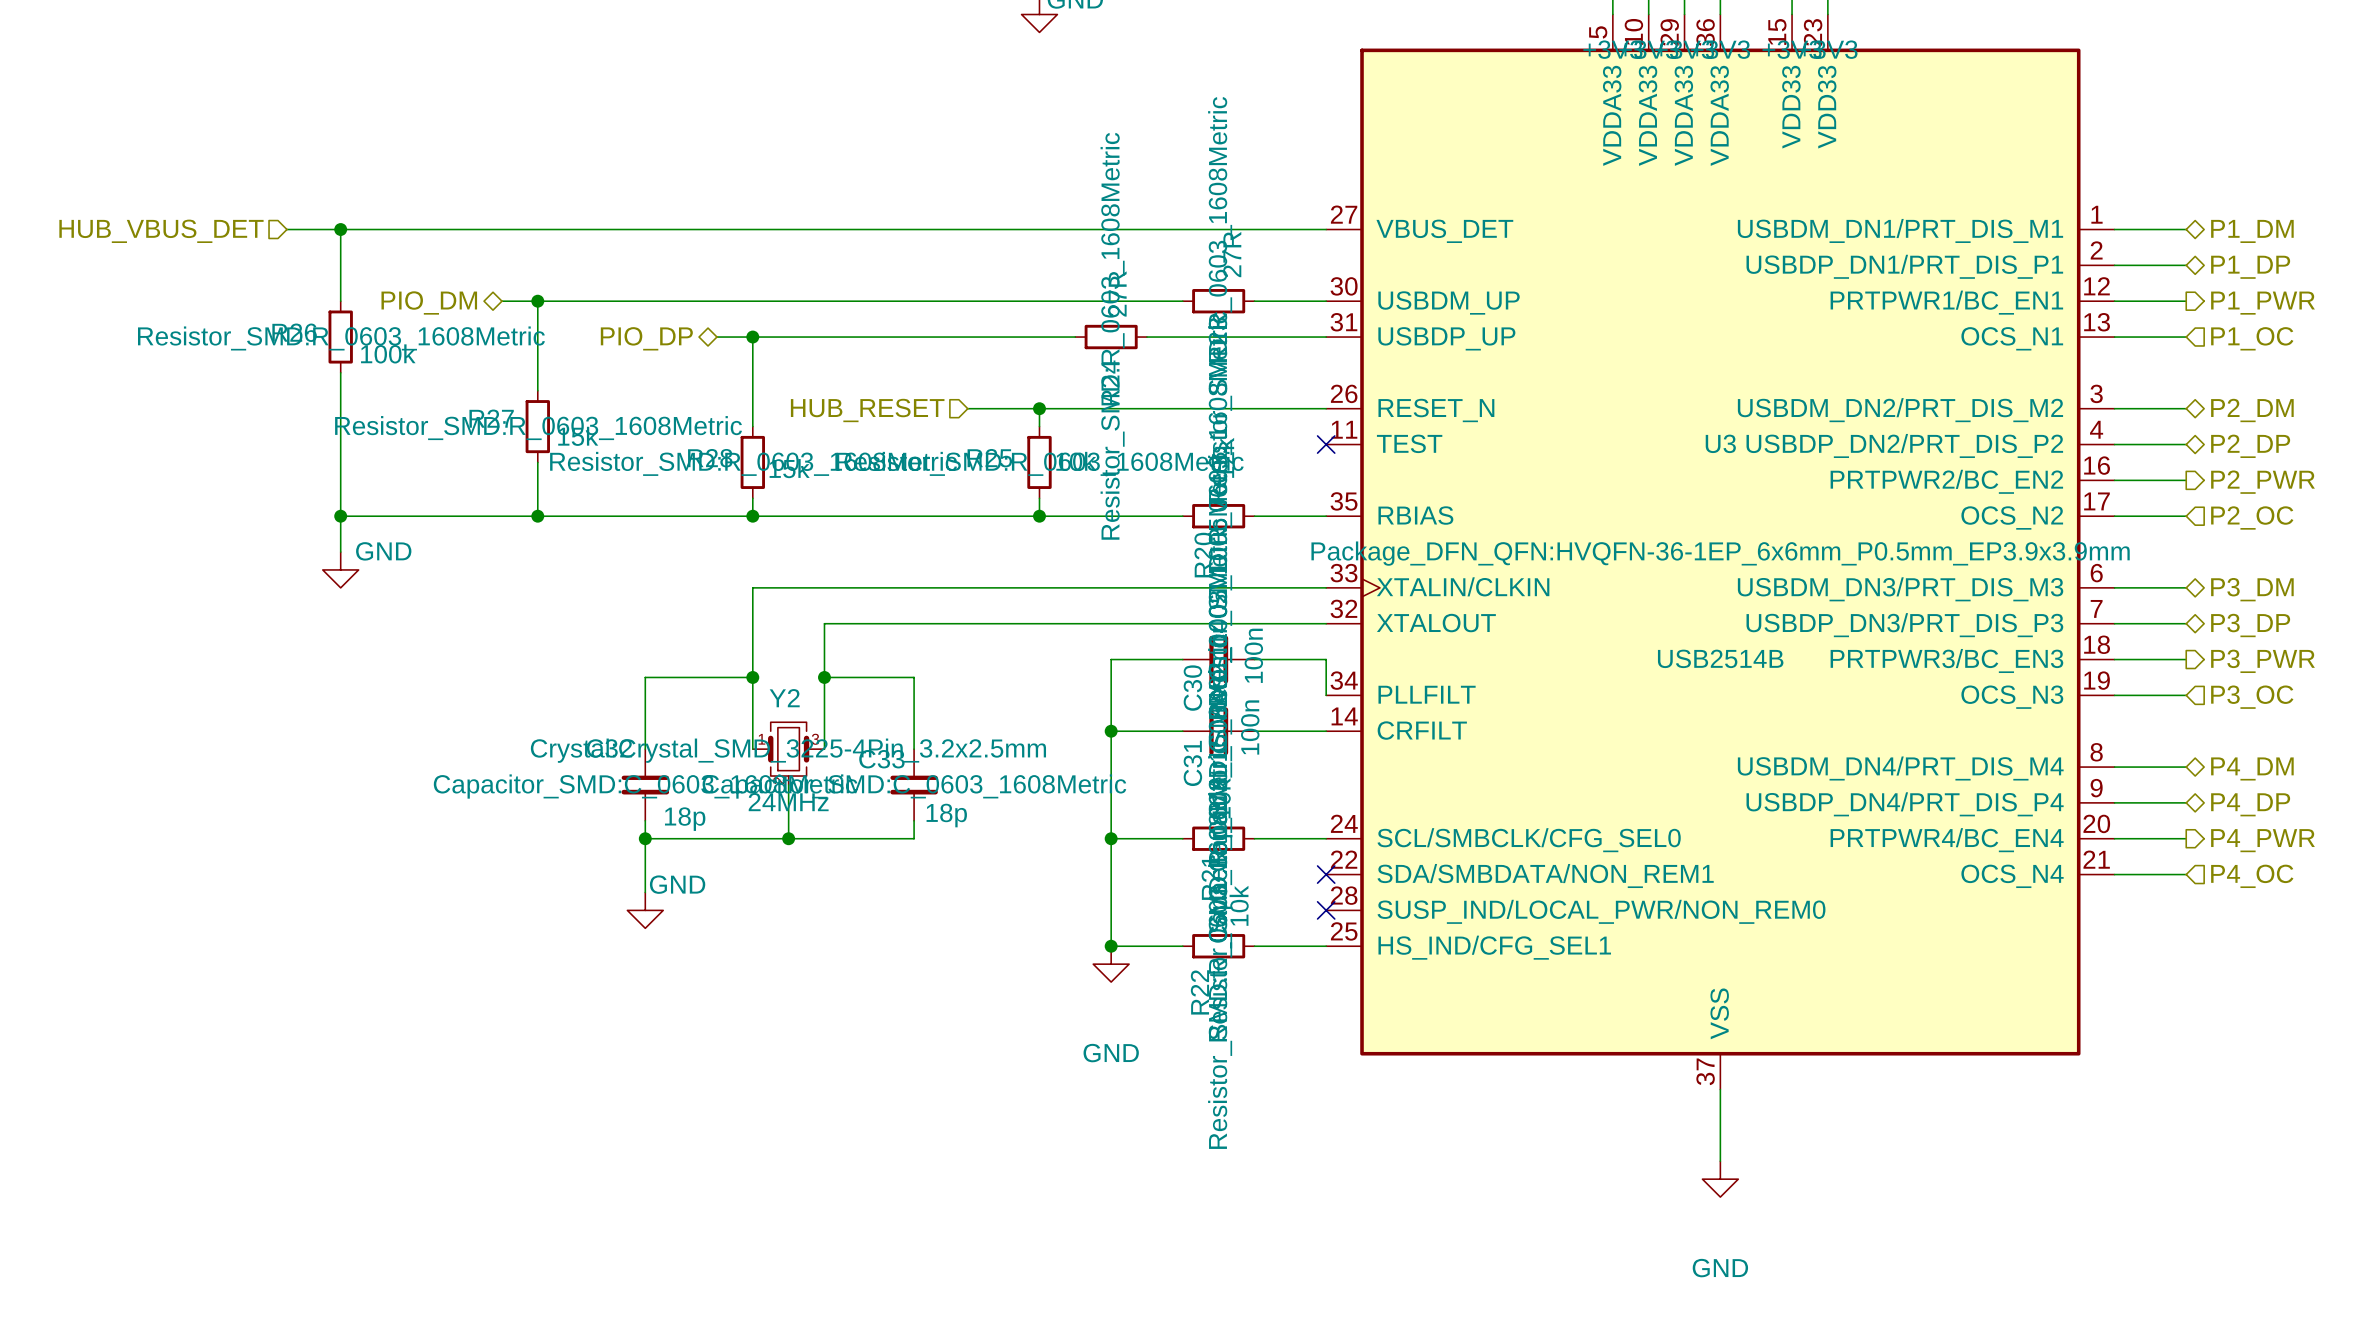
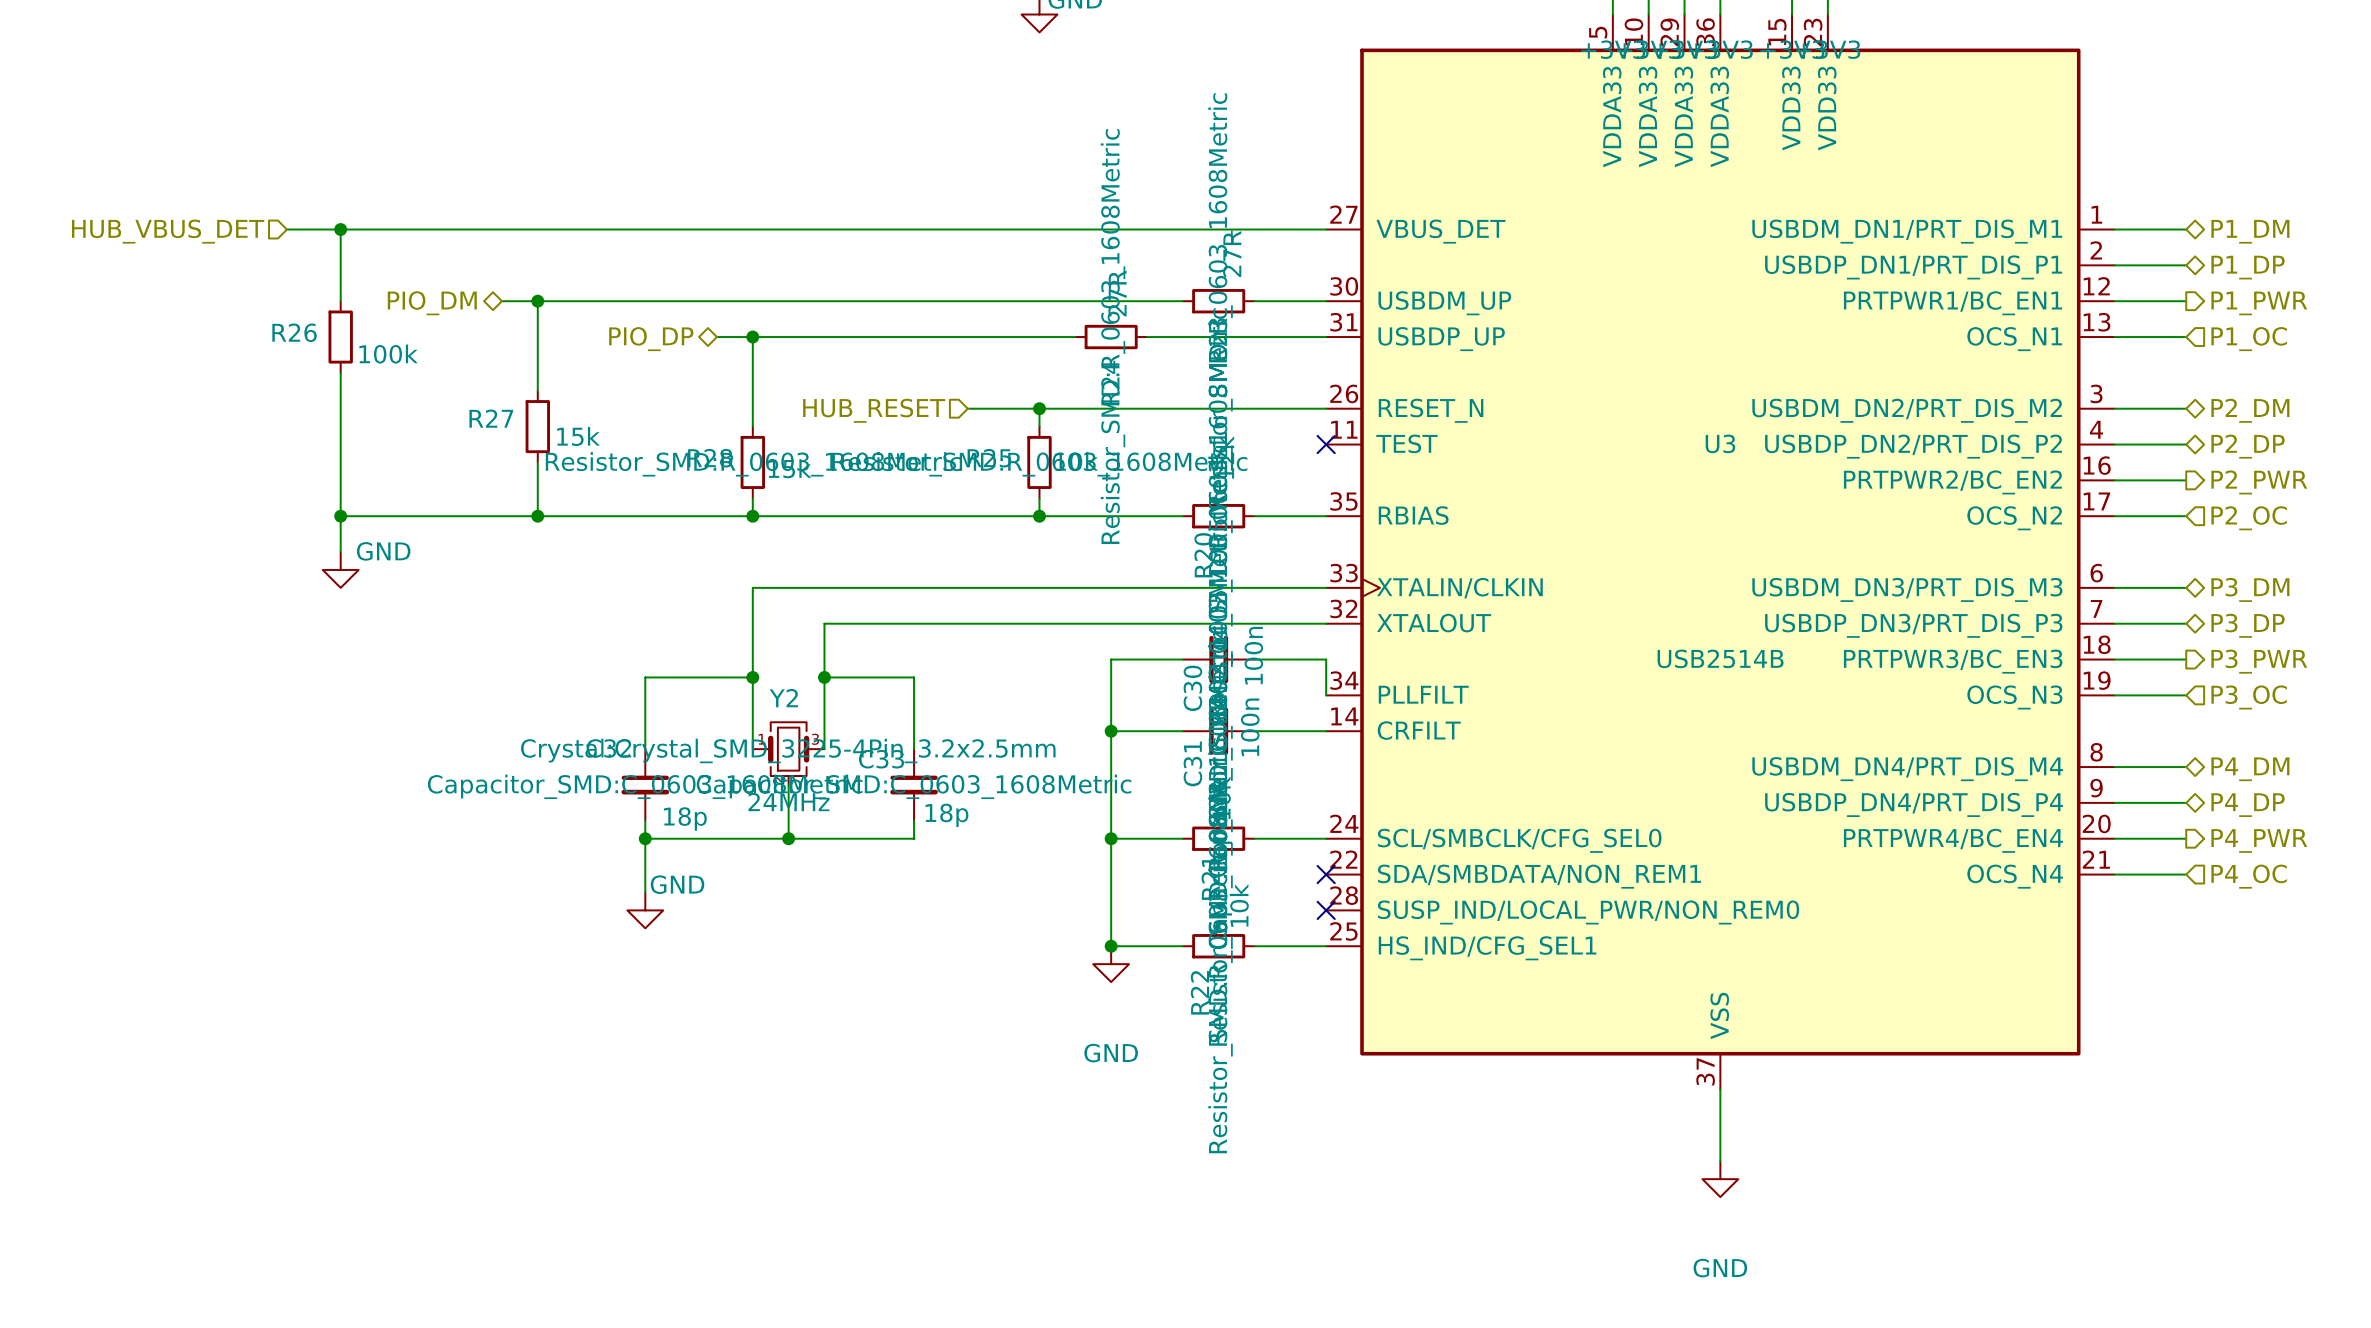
R26 text: Resistor_SMD:R_0603_1608Metric (341, 338) -> none
R27 text: Resistor_SMD:R_0603_1608Metric (538, 428) -> none
U3 text: Package_DFN_QFN:HVQFN-36-1EP_6x6mm_P0.5mm_EP3.9x3.9mm (1720, 553) -> none

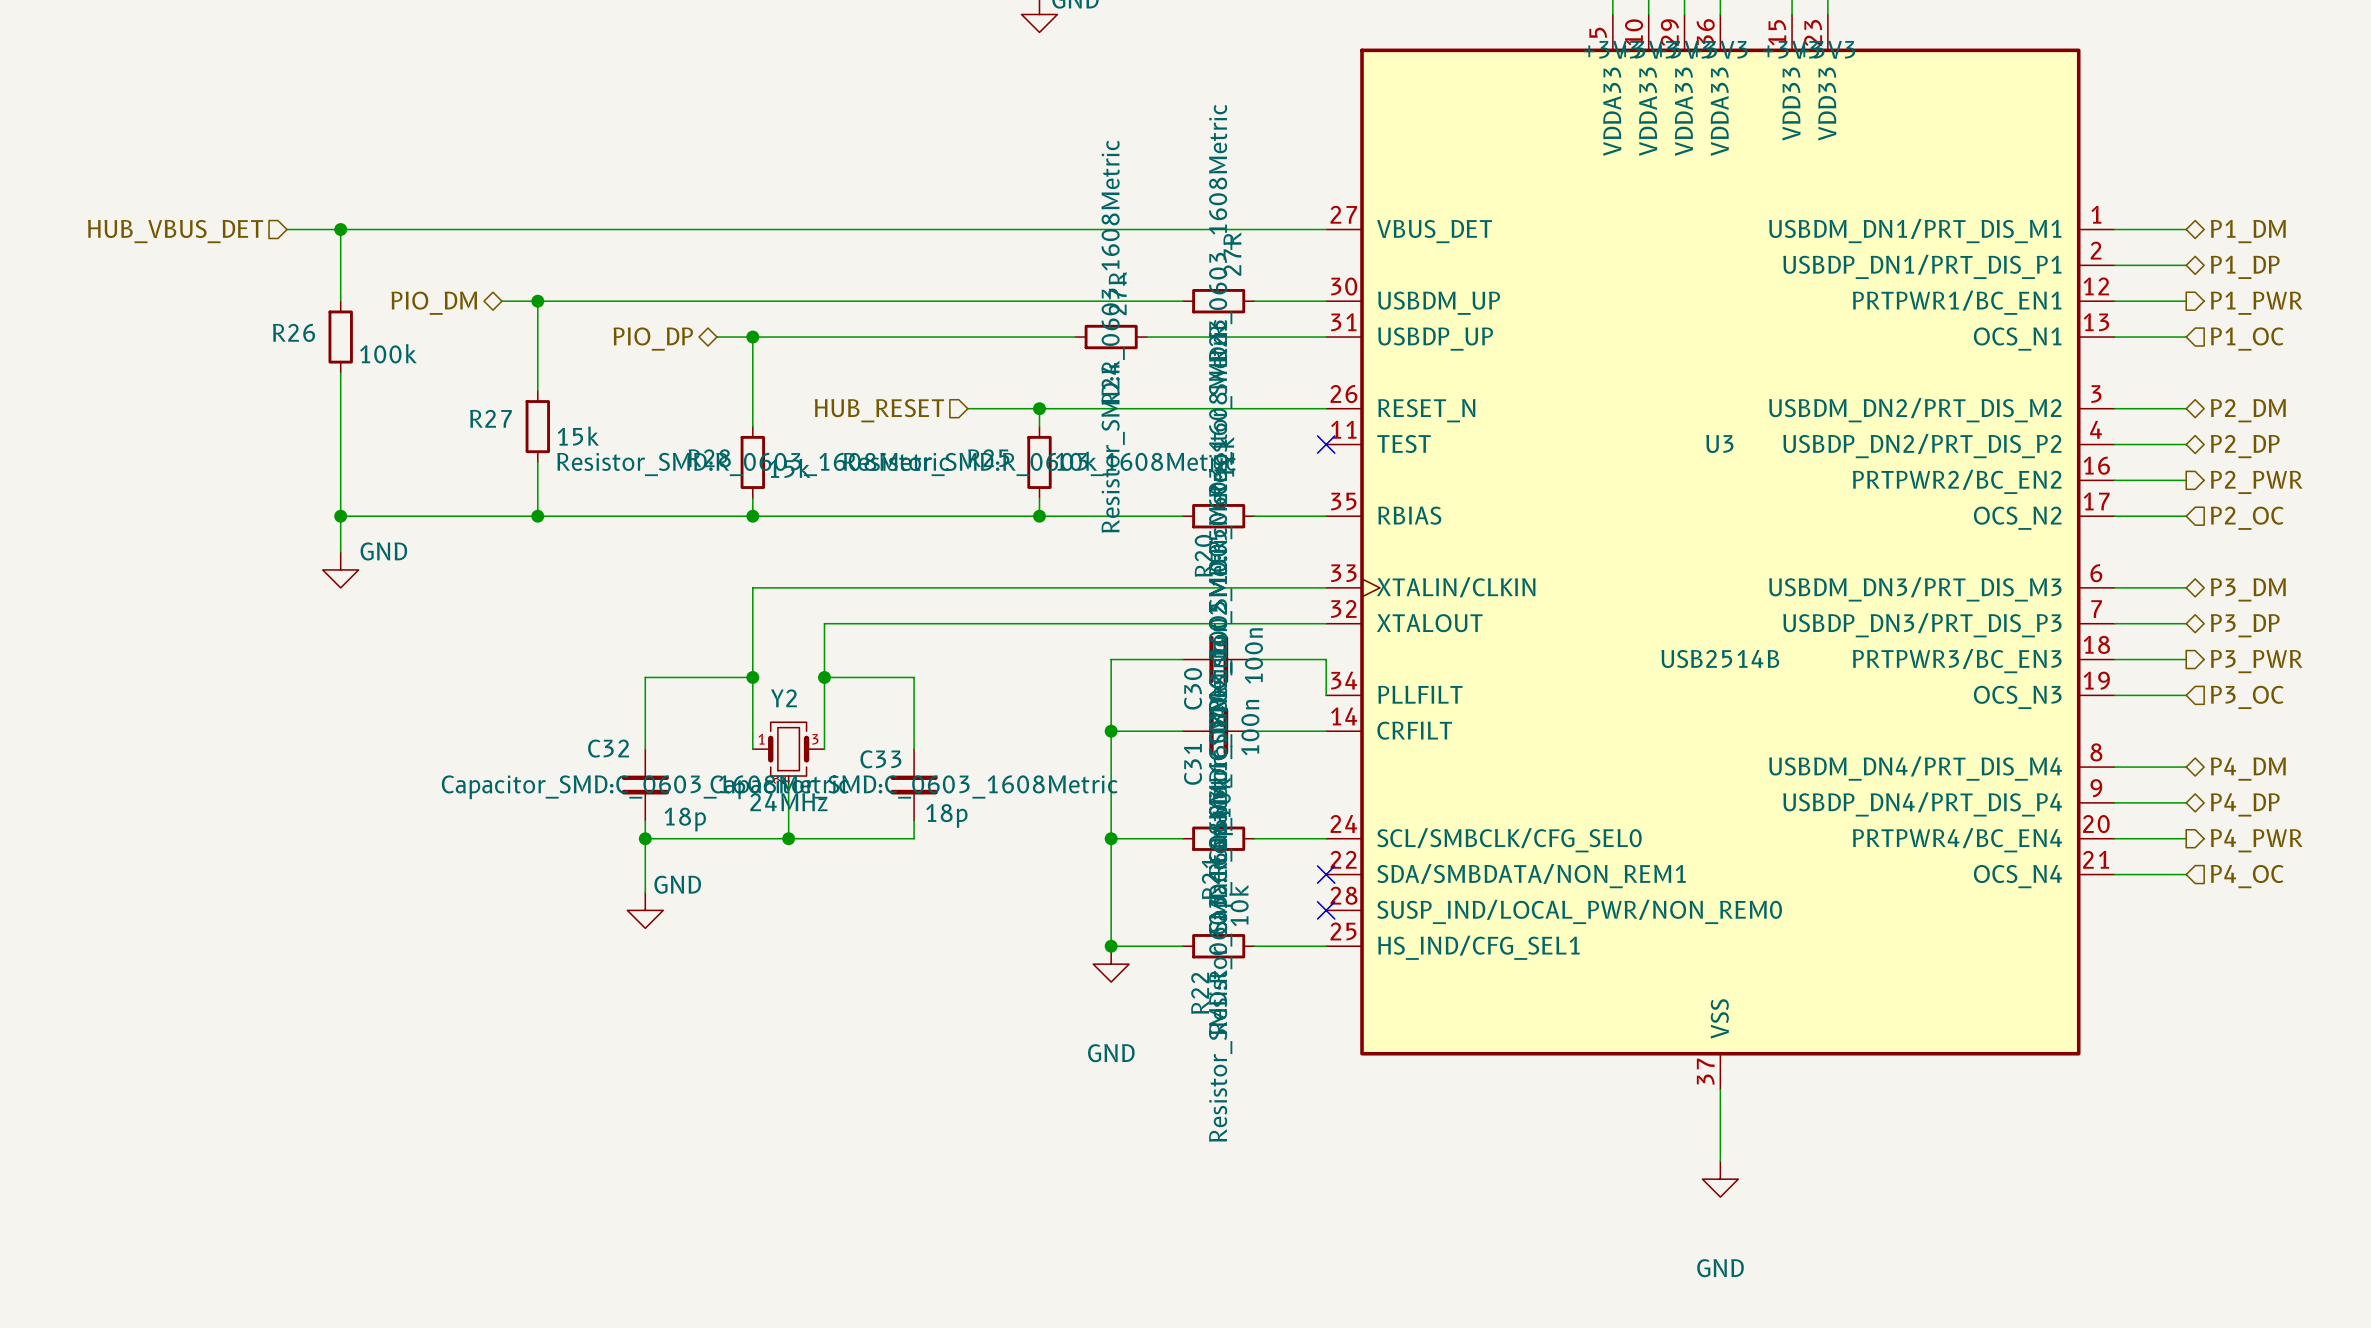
Y2 text: Crystal:Crystal_SMD_3225-4Pin_3.2x2.5mm (788, 750) -> none

